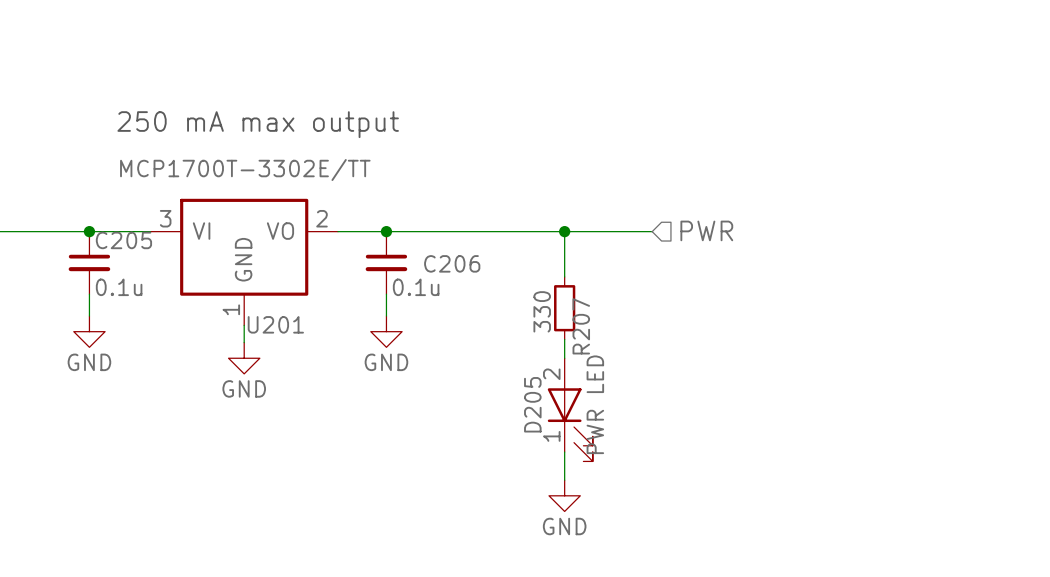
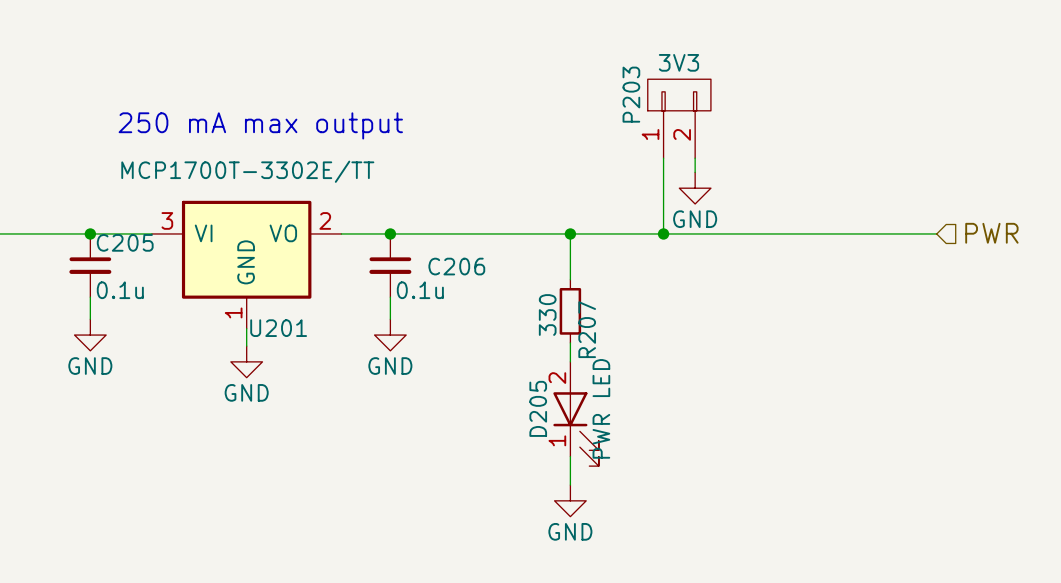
P203: none -> 3V3 (679, 118)
wire: none -> (663, 158) (663, 233)
wire: none -> (695, 158) (695, 172)
power symbol: none -> GND (695, 188)
hierarchical label position: PWR (706, 230) -> PWR (991, 233)
wire: none -> (658, 233) (936, 233)
junction: none -> (663, 233)

